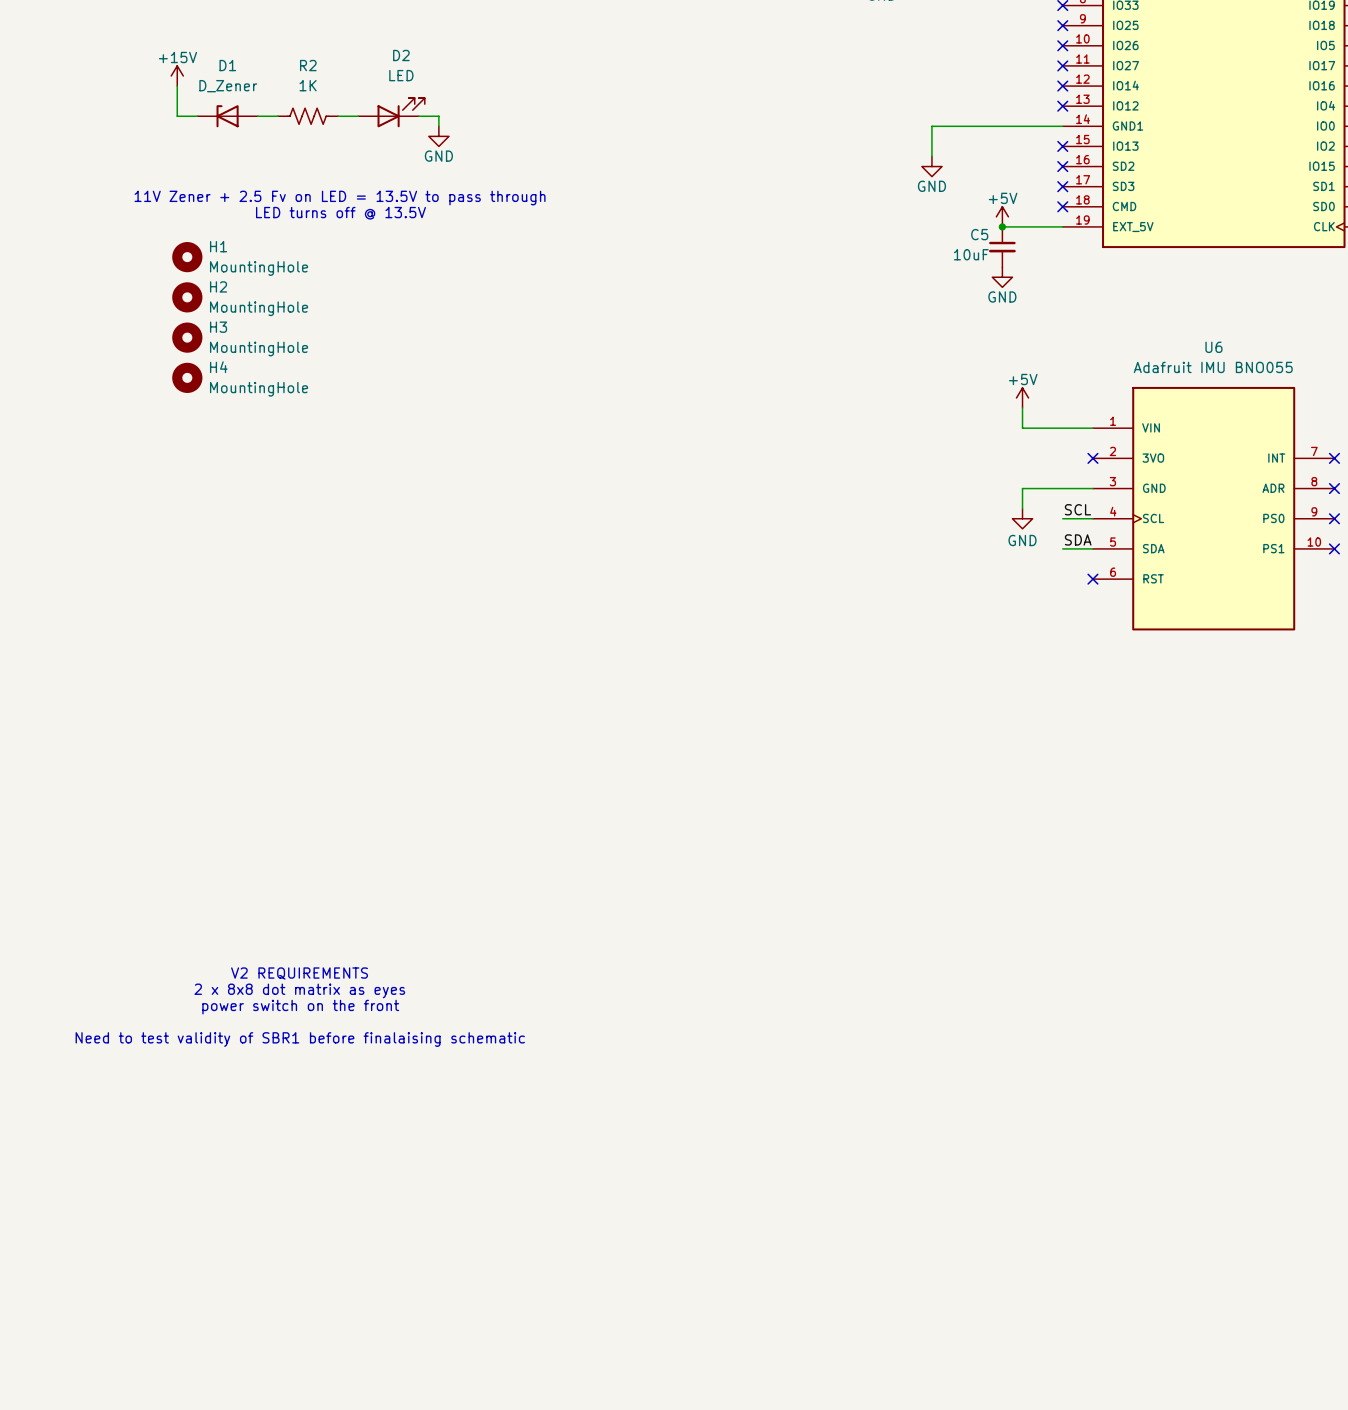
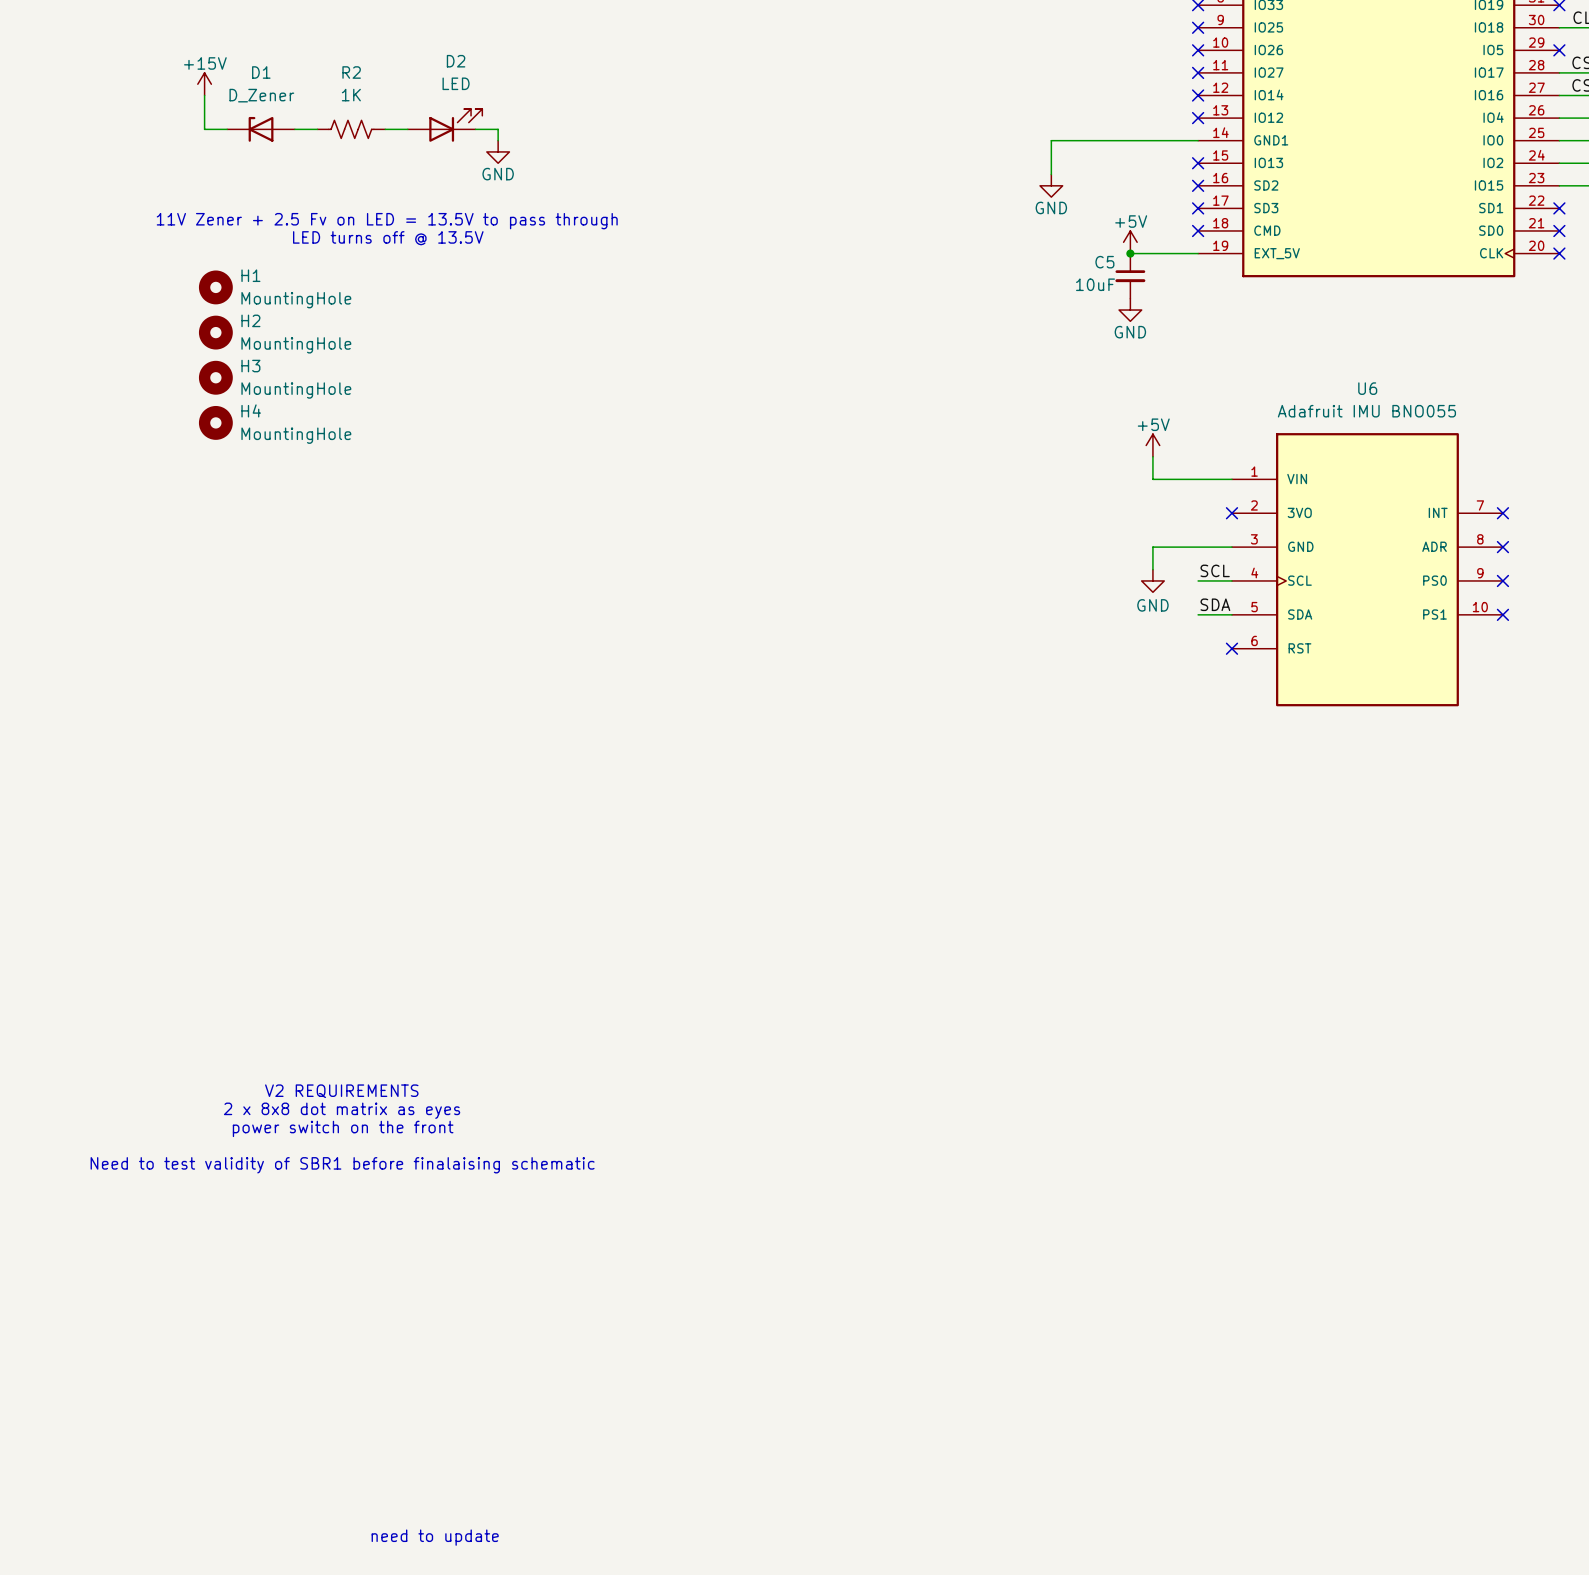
text: none -> need to update (435, 1537)

